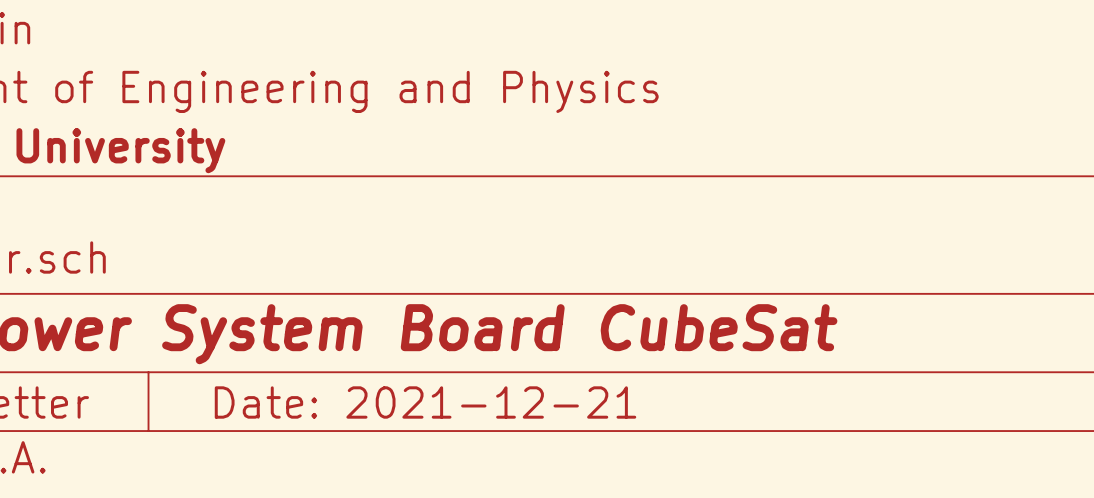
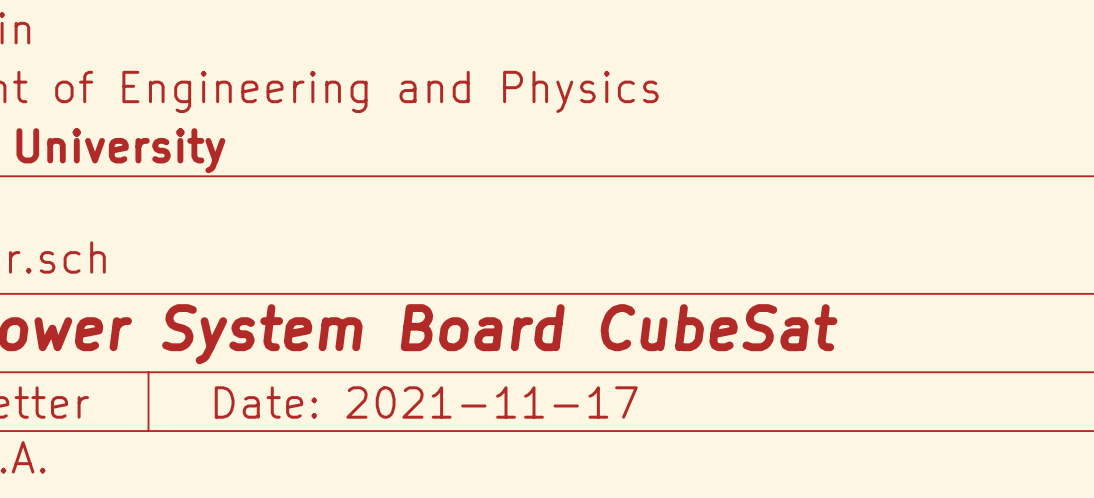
title block: Date: 2021-12-21 (425, 402) -> Date: 2021-11-17 (426, 402)

